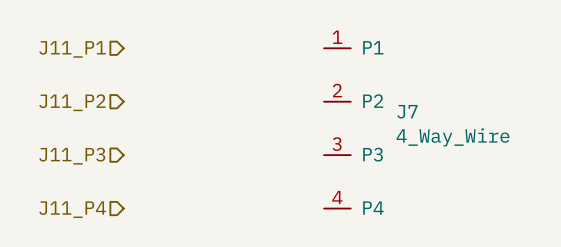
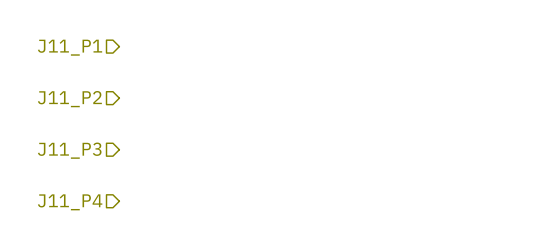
J7: 4_Way_Wire (337, 128) -> none

